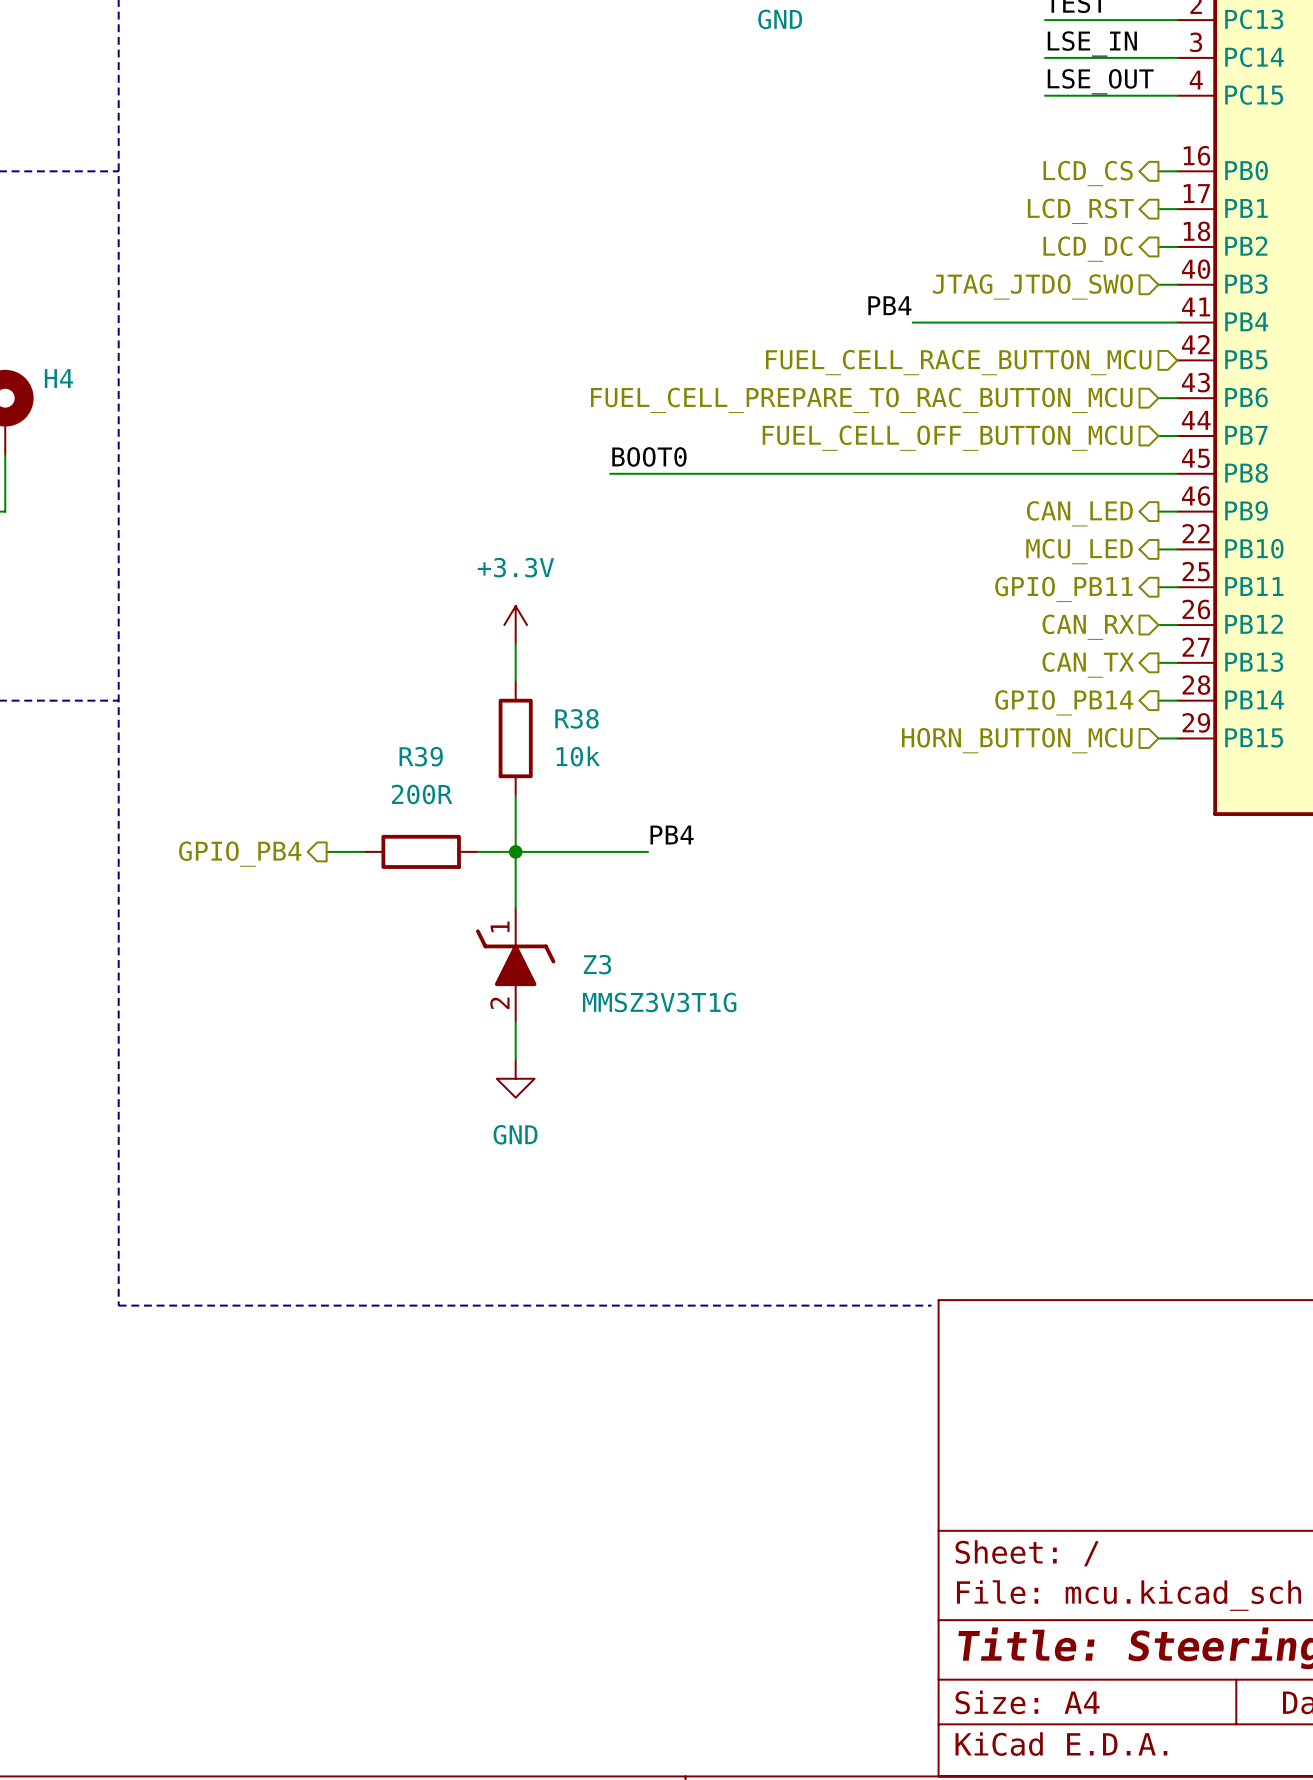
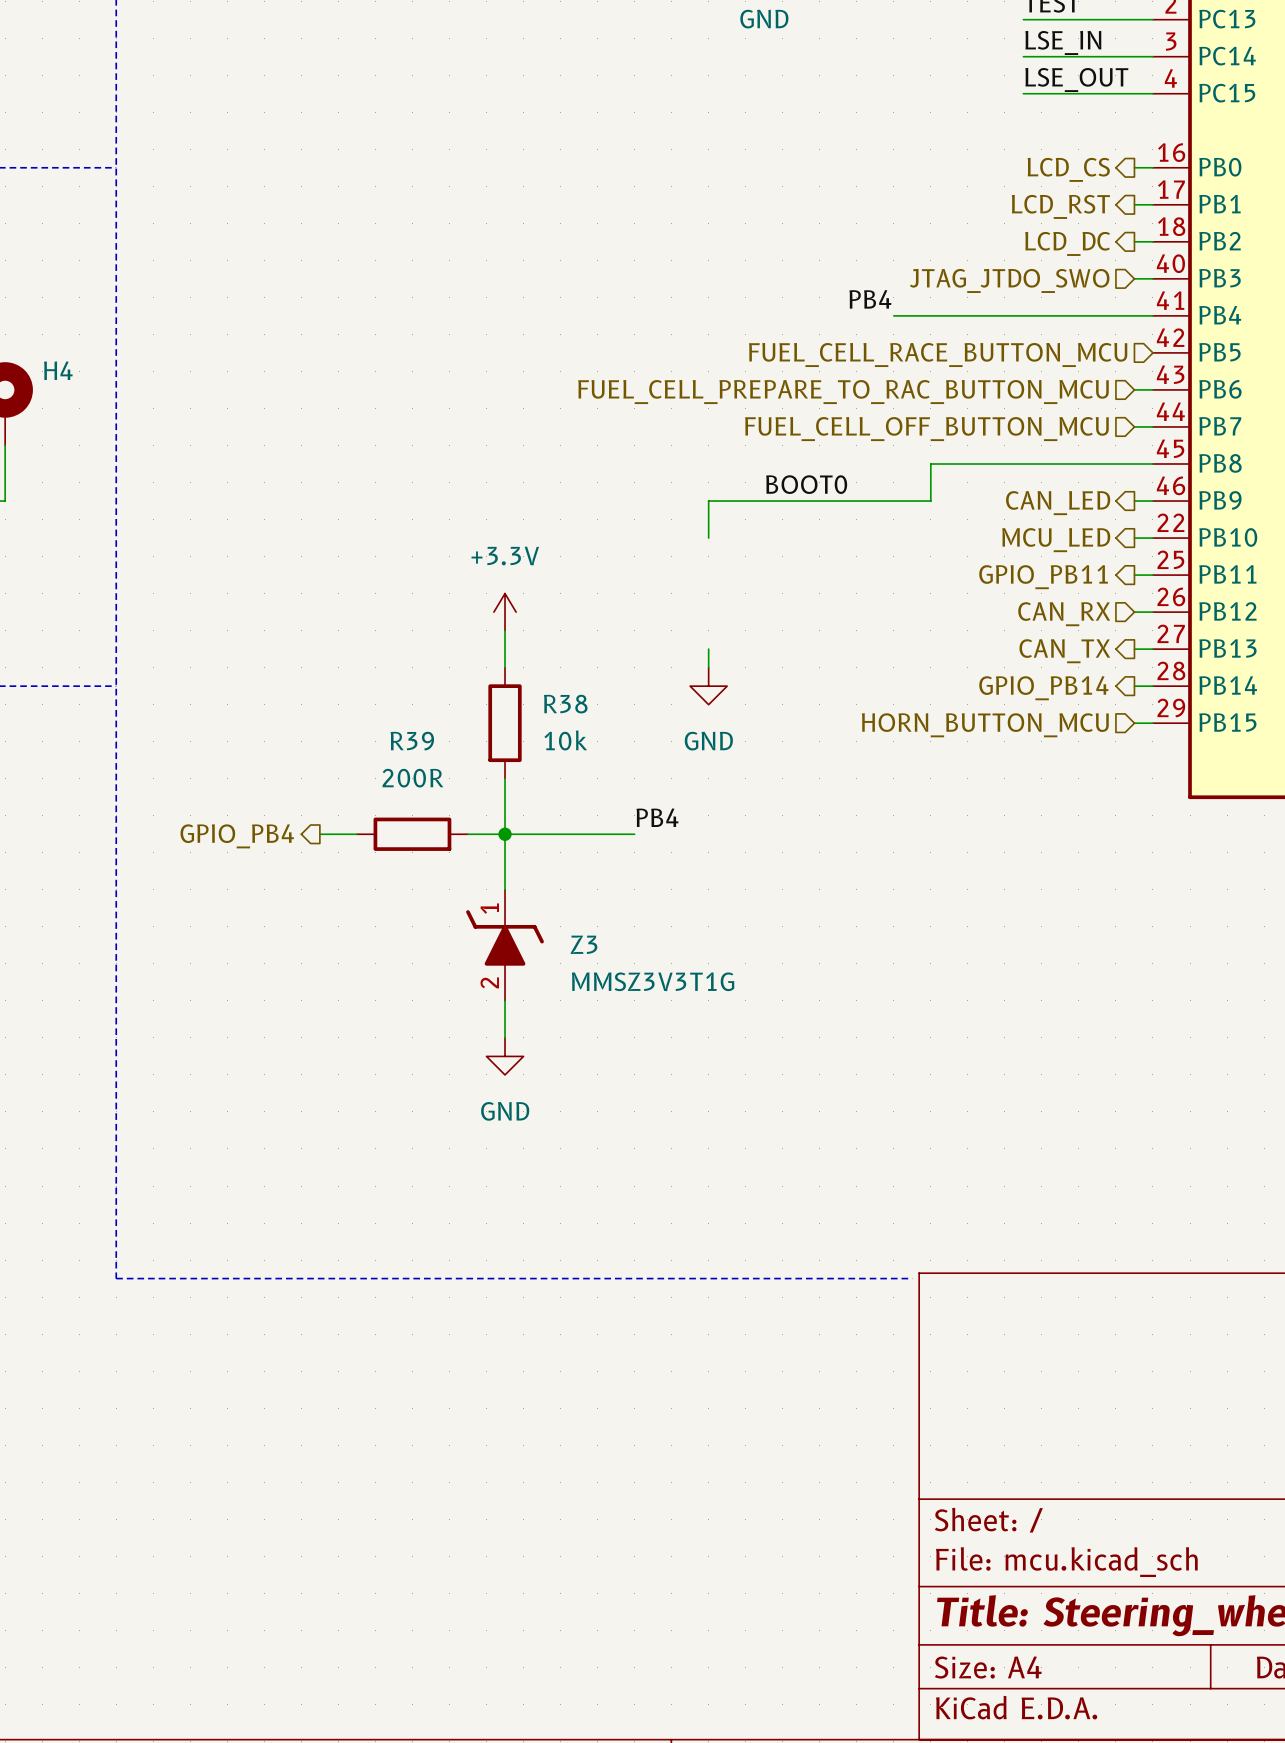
label position: BOOT0 (649, 456) -> BOOT0 (806, 484)
wire: (610, 473) (950, 473) -> (708, 538) (708, 501) (930, 501) (930, 463)
wire: none -> (708, 649) (708, 667)
power symbol: none -> GND (708, 686)

